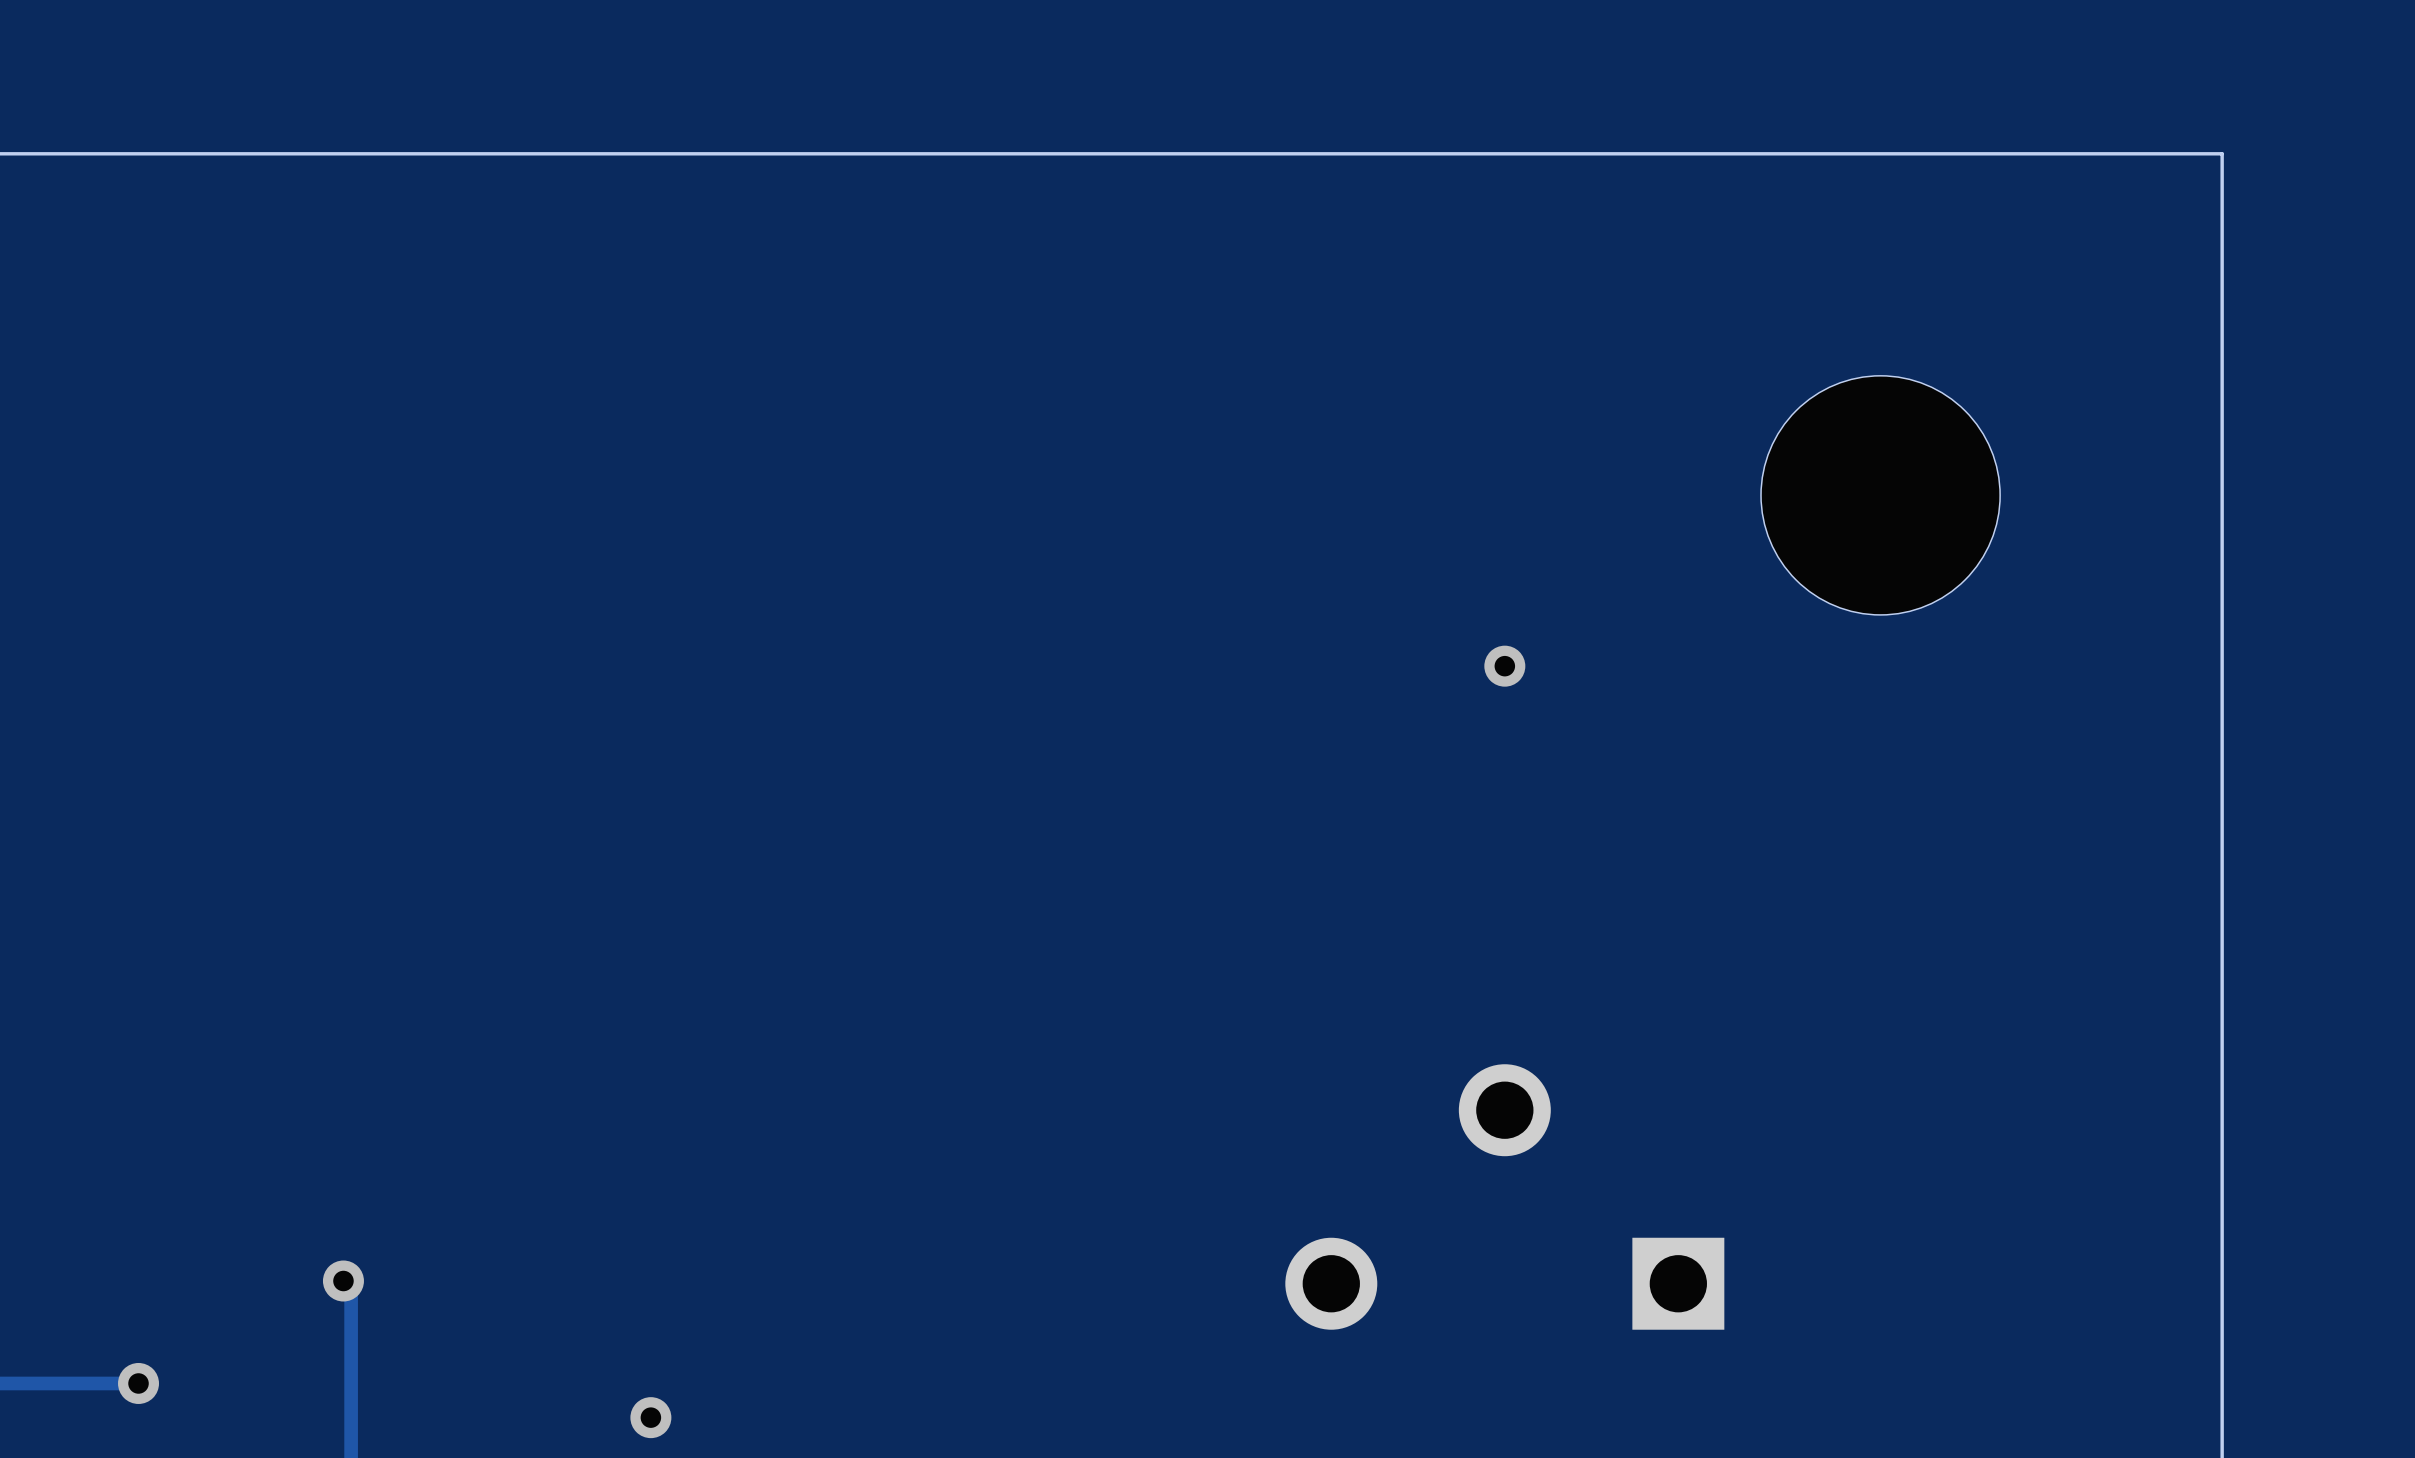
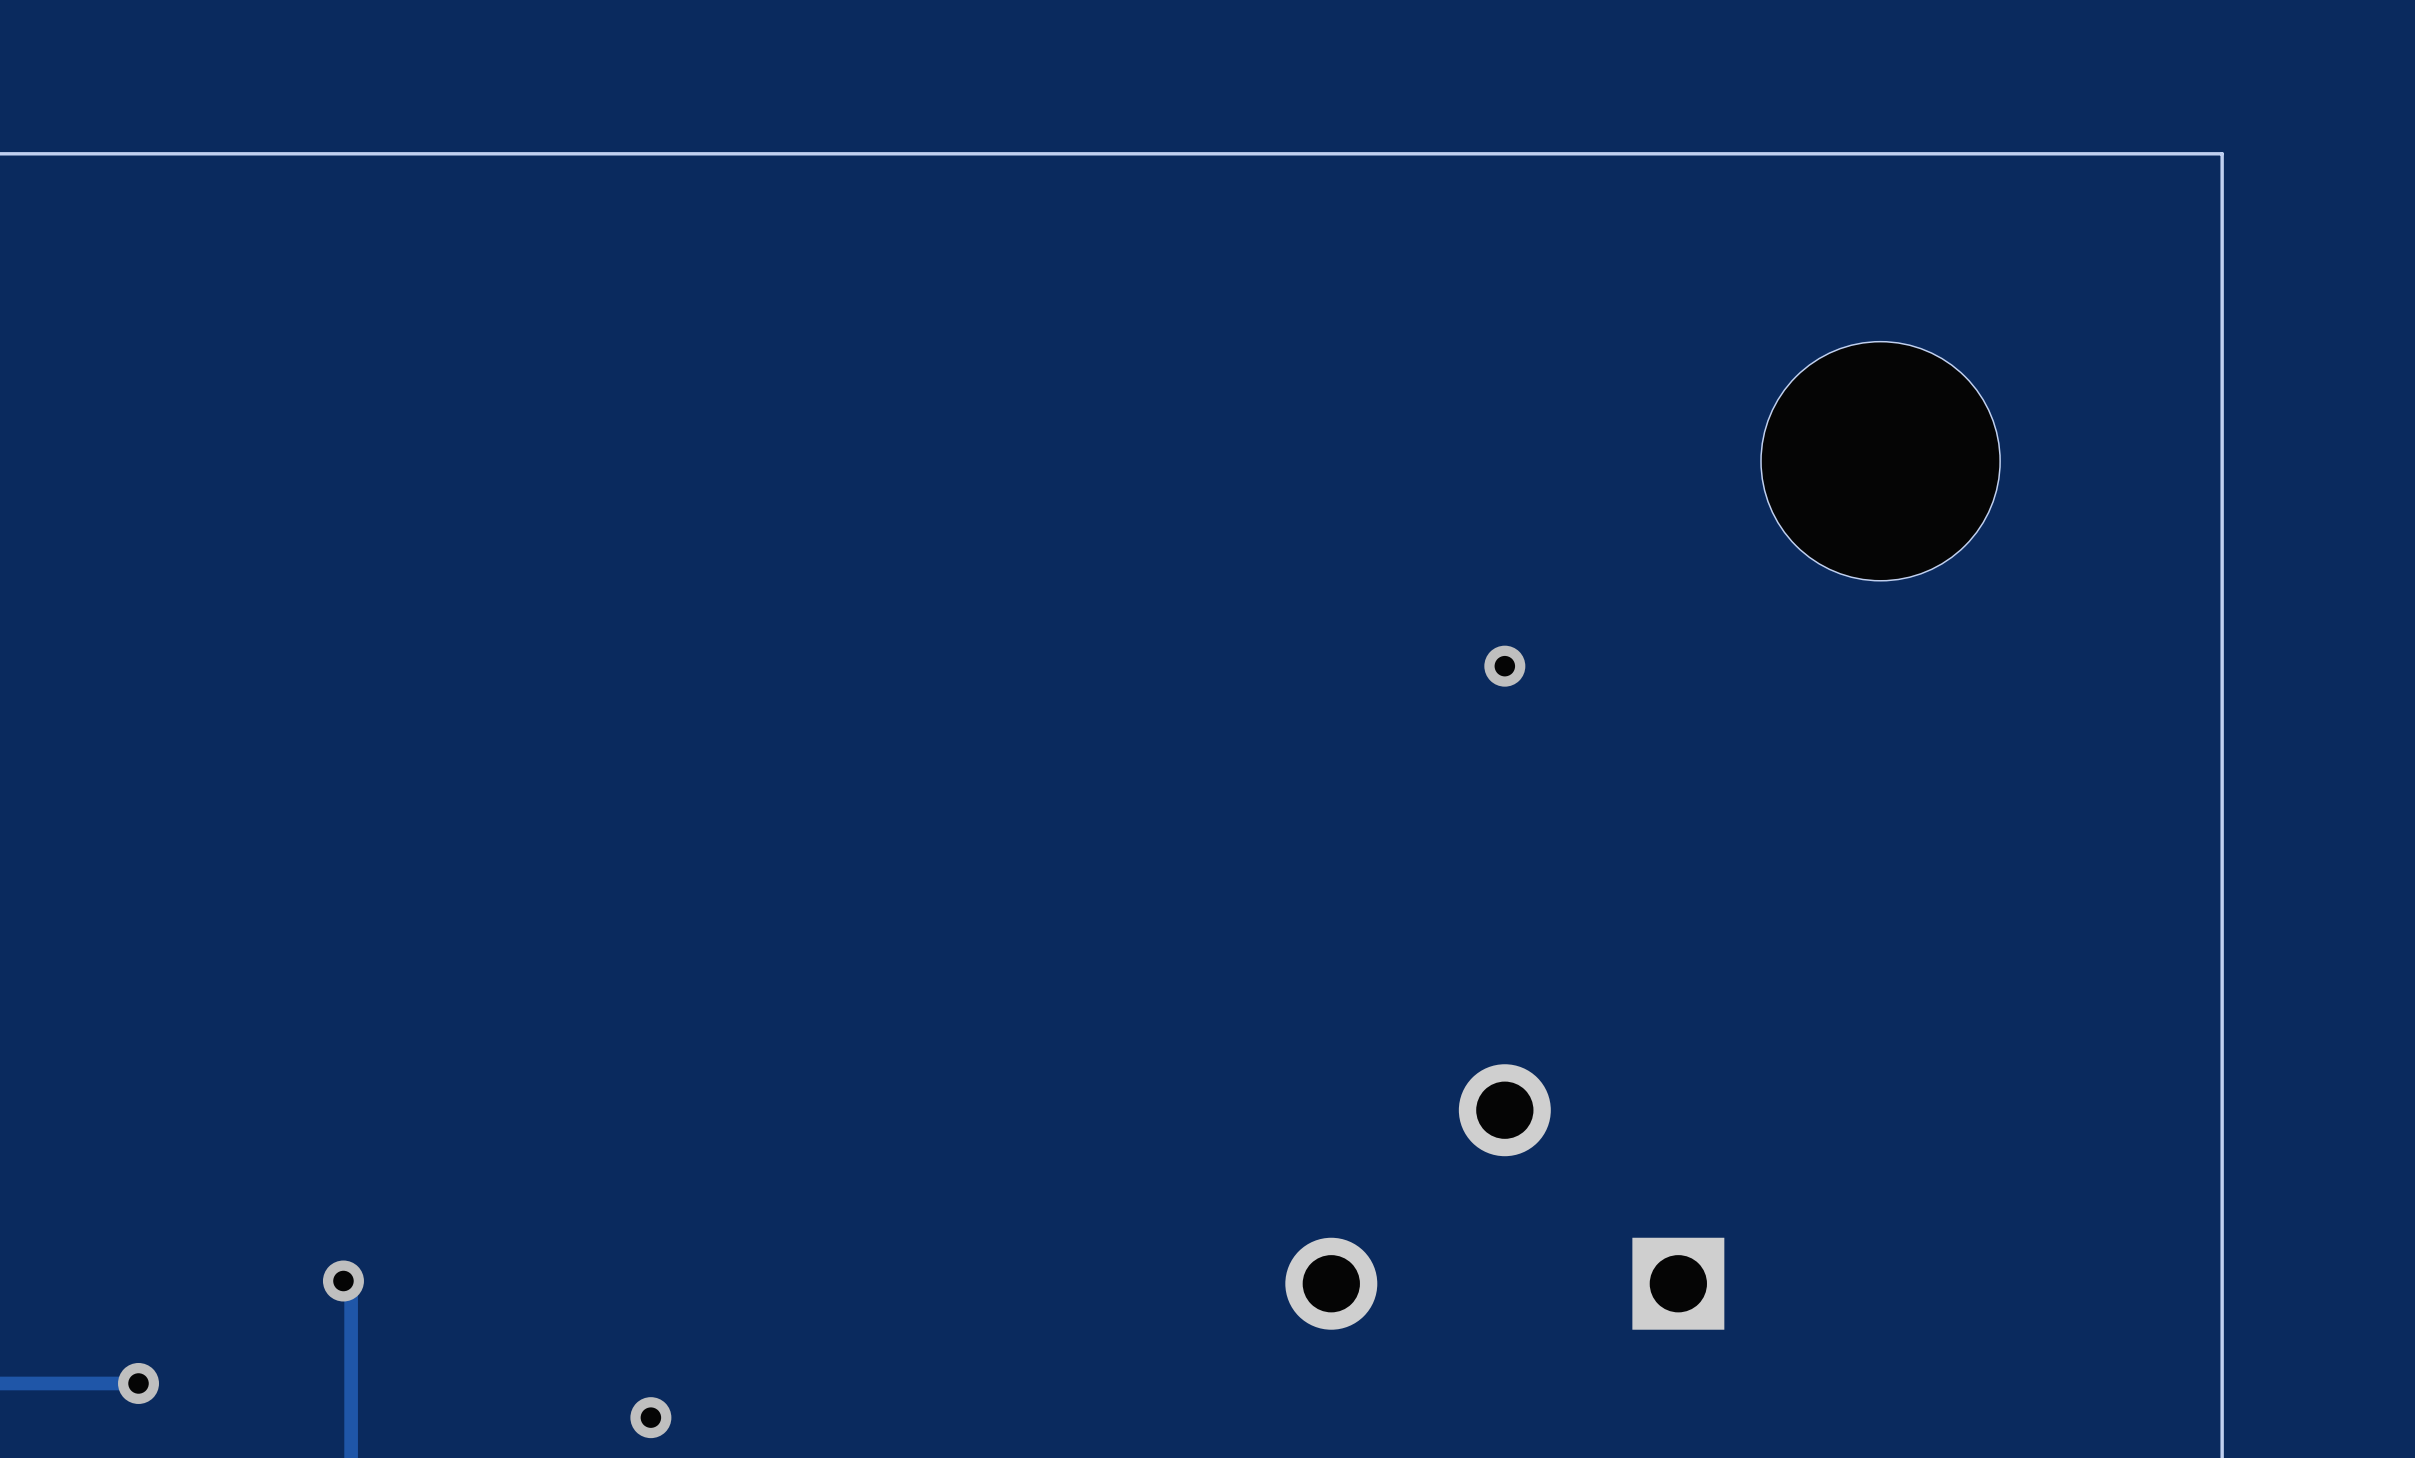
part position: (1880, 495) -> (1880, 461)

